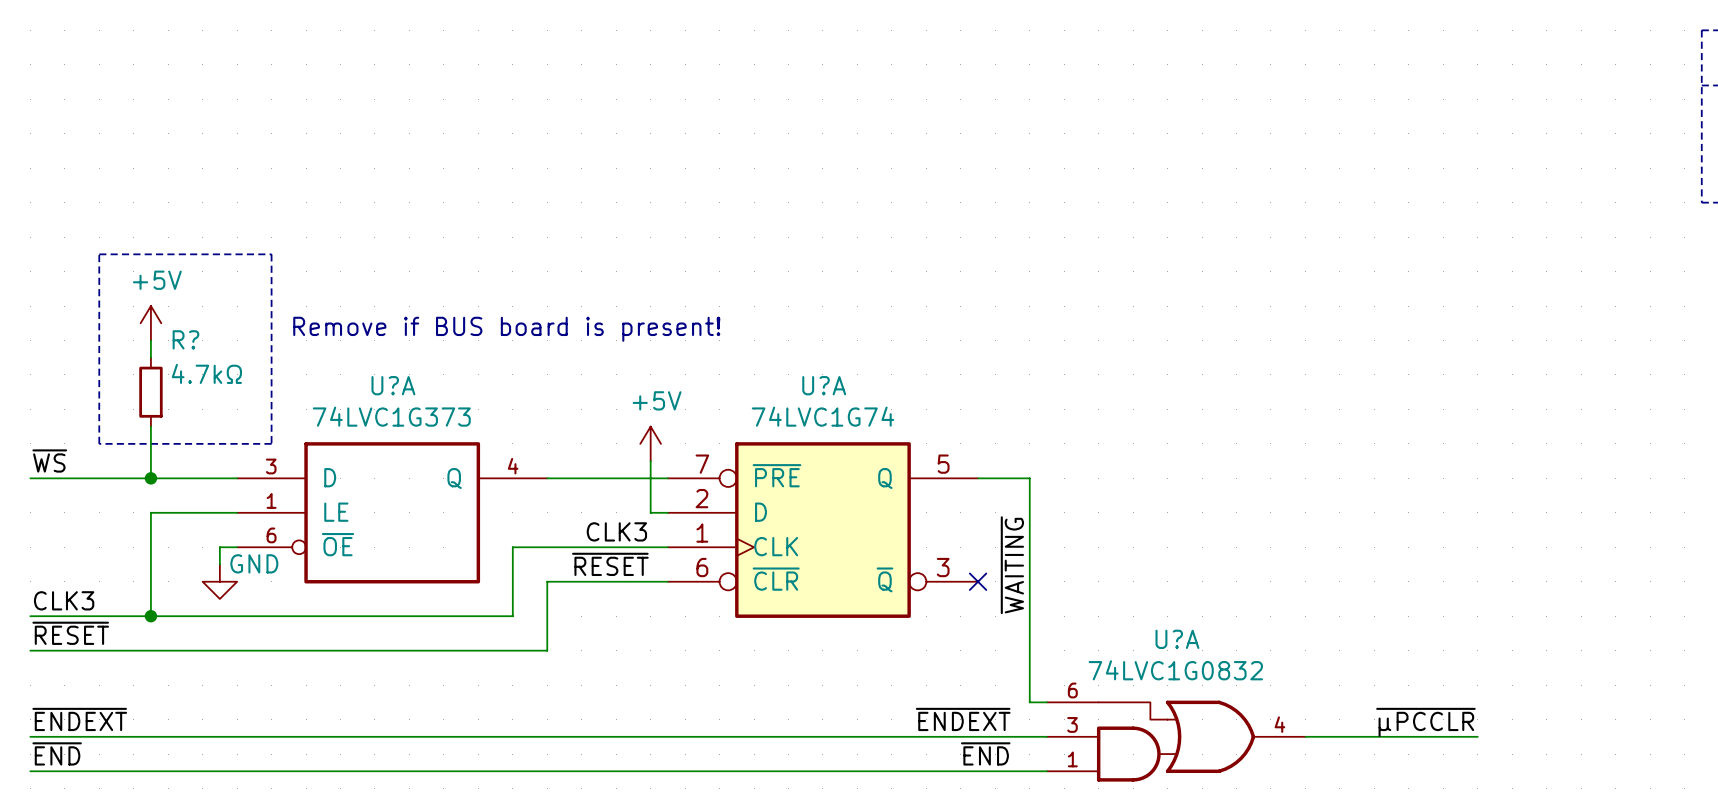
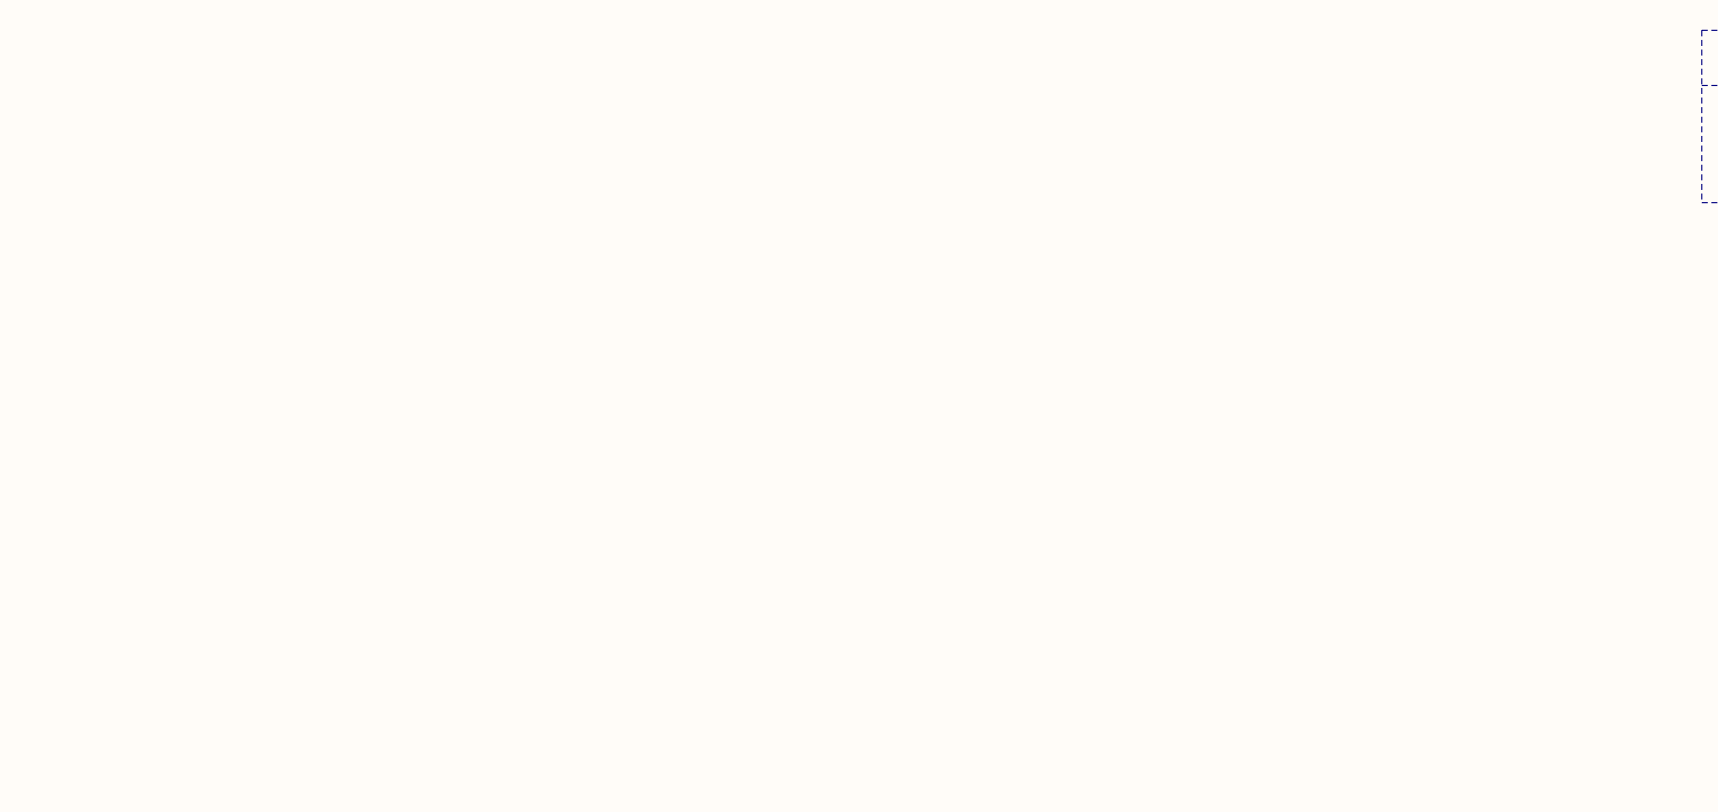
line: (99, 254) (271, 254) (271, 443) (99, 443) (99, 254) -> none
power symbol: +5V (150, 323) -> none
text: Remove if BUS board is present! (506, 329) -> none
wire: (150, 340) (150, 357) -> none
R?: 4.7kΩ (150, 392) -> none
wire: (150, 426) (150, 478) -> none
power symbol: +5V (650, 443) -> none
label: ~{WS} (49, 460) -> none
wire: (650, 461) (650, 512) (667, 512) -> none
wire: (30, 478) (237, 478) -> none
junction: (150, 478) -> none
wire: (547, 478) (667, 478) -> none
wire: (978, 478) (1029, 478) (1029, 702) (1046, 702) -> none
wire: (237, 512) (150, 512) (150, 616) -> none
U?A: 74LVC1G373 (392, 512) -> none
U?A: 74LVC1G74 (822, 530) -> none
label: CLK3 (616, 531) -> none
wire: (237, 547) (219, 547) (219, 564) -> none
wire: (667, 547) (512, 547) (512, 616) (30, 616) -> none
label: ~{RESET} (610, 564) -> none
label: ~{WAITING} (1012, 565) -> none
power symbol: GND (219, 581) -> none
wire: (667, 581) (547, 581) (547, 650) (30, 650) -> none
no-connect mark: (978, 581) -> none
label: CLK3 (64, 600) -> none
junction: (150, 616) -> none
label: ~{RESET} (70, 633) -> none
label: ~{ENDEXT} (79, 719) -> none
label: ~{ENDEXT} (963, 719) -> none
label: ~{µPCCLR} (1425, 722) -> none
wire: (30, 736) (1046, 736) -> none
wire: (1305, 736) (1477, 736) -> none
U?A: 74LVC1G0832 (1176, 741) -> none
label: ~{END} (57, 753) -> none
label: ~{END} (985, 753) -> none
wire: (30, 771) (1046, 771) -> none

